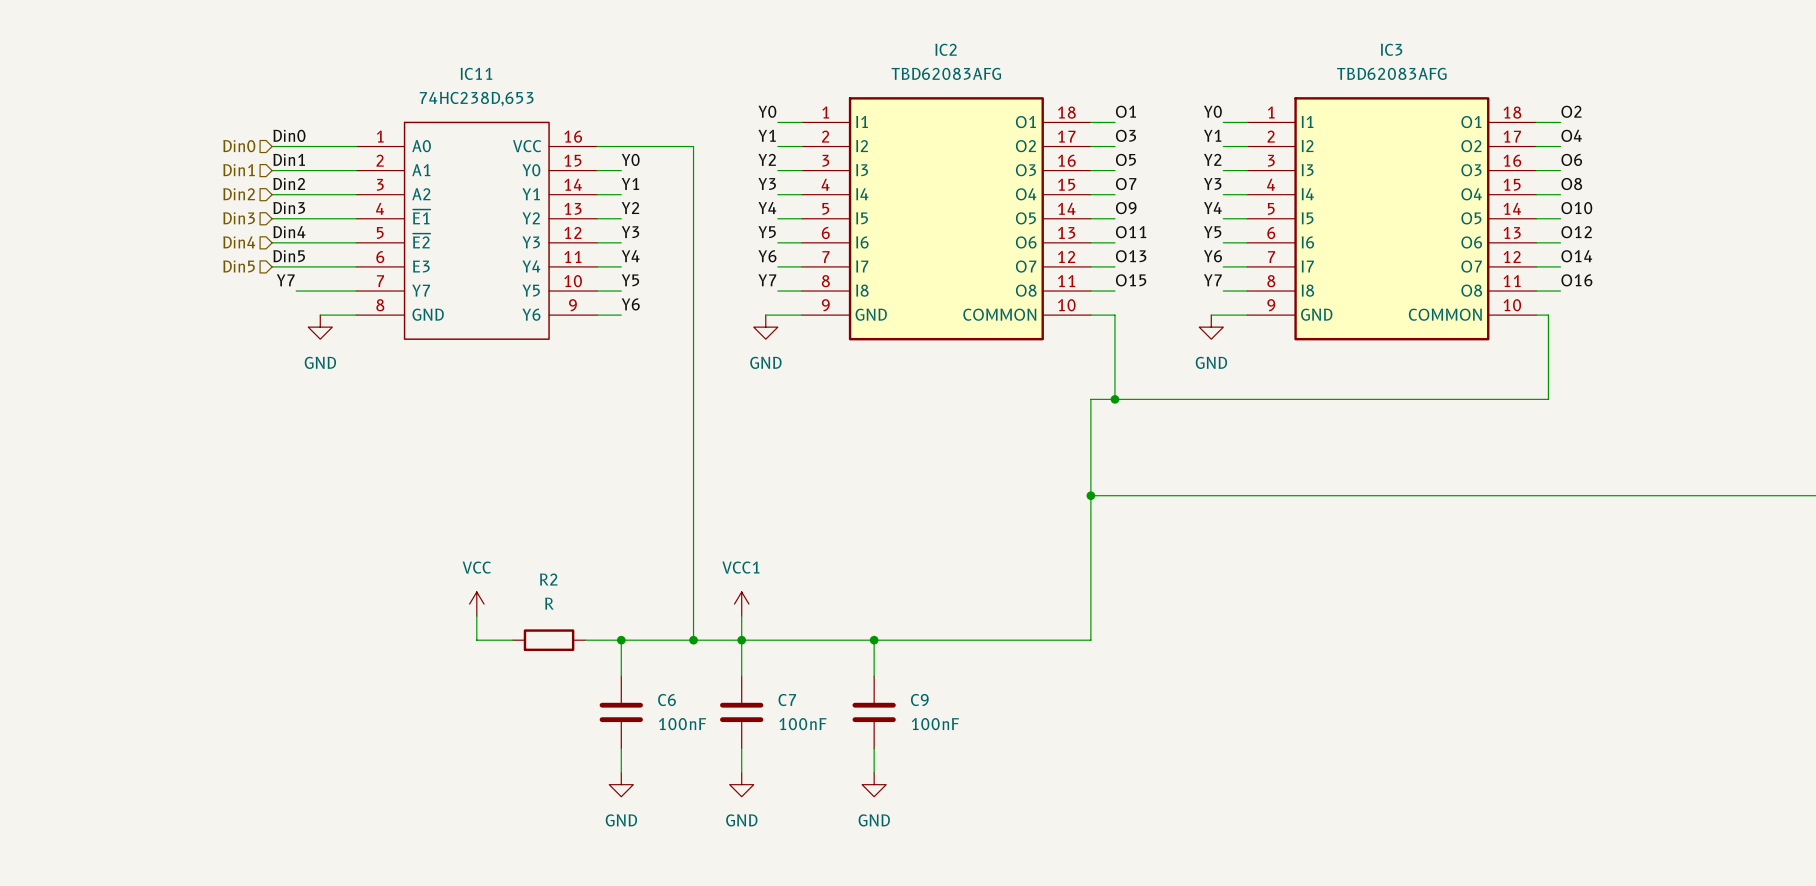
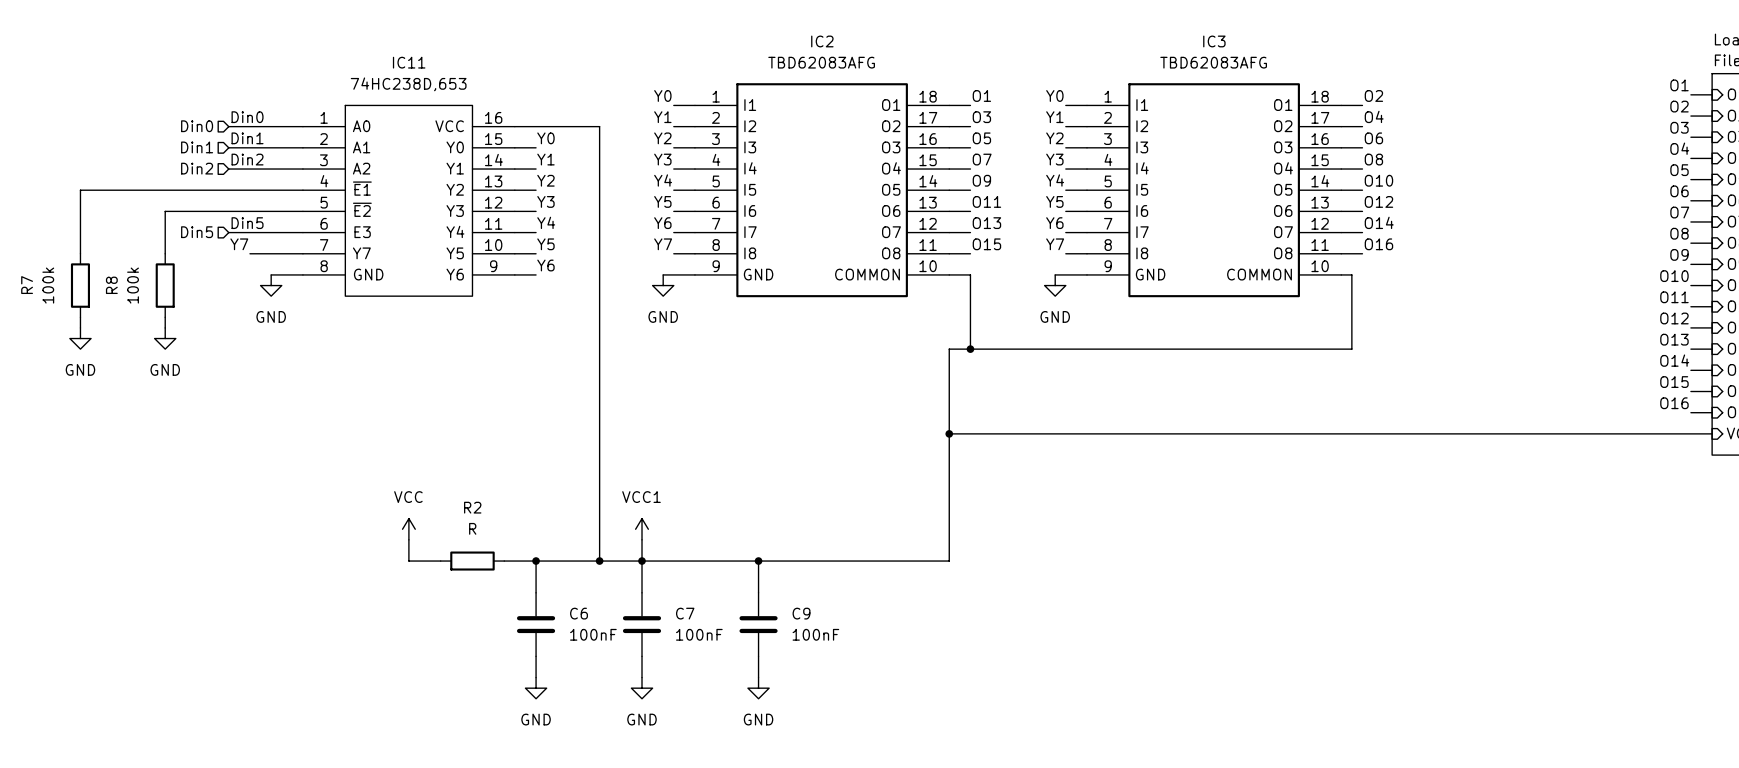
label: Din3 (289, 208) -> none
hierarchical label: Din3 (239, 218) -> none
wire: none -> (228, 190) (80, 190) (80, 253)
label: Din4 (289, 232) -> none
hierarchical label: Din4 (239, 242) -> none
wire: none -> (228, 211) (165, 211) (165, 253)
R7: none -> 100k (80, 285)
R8: none -> 100k (165, 285)
wire: none -> (80, 317) (80, 327)
wire: none -> (165, 317) (165, 327)
power symbol: none -> GND (80, 338)
power symbol: none -> GND (165, 338)

